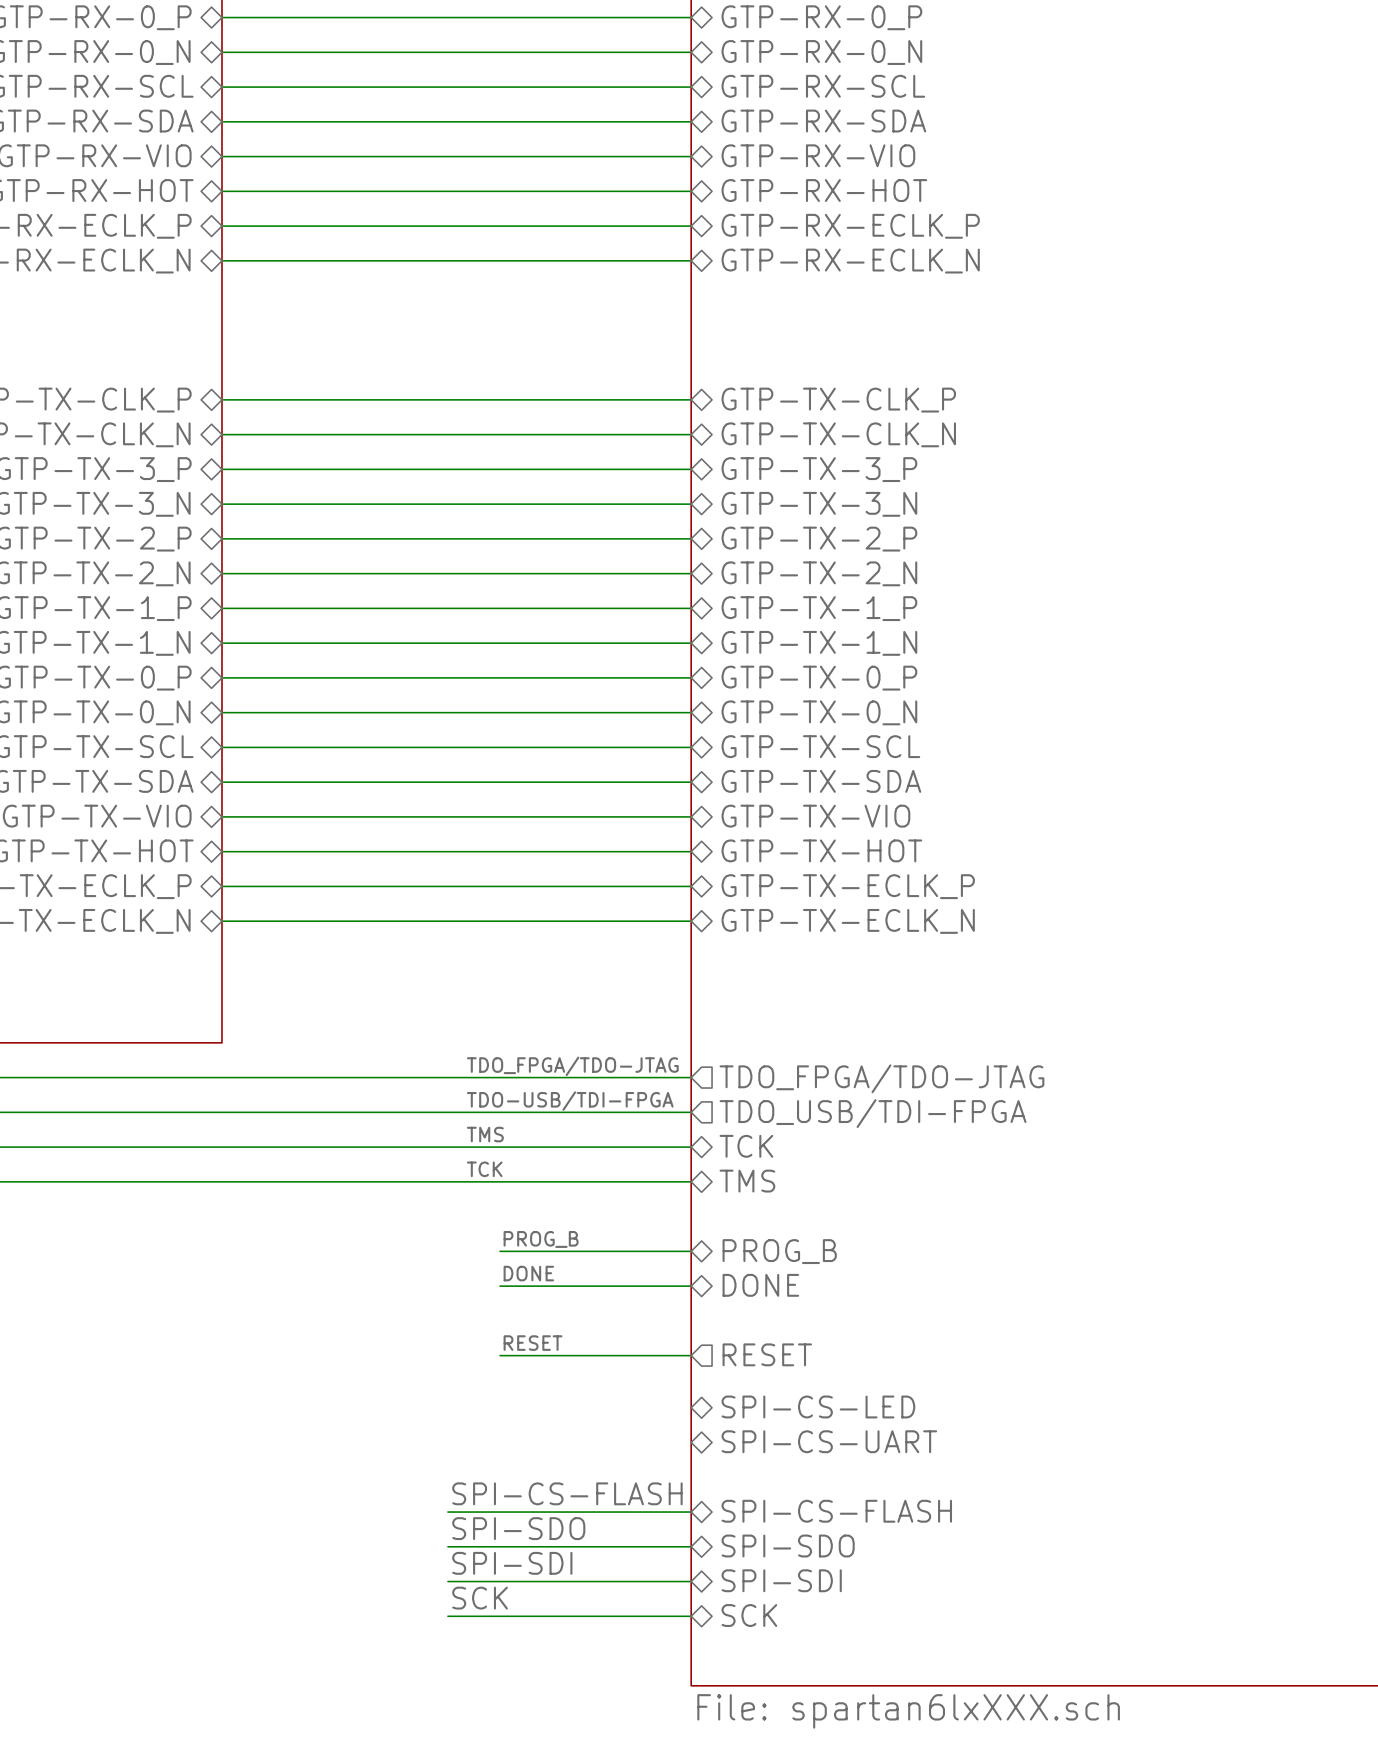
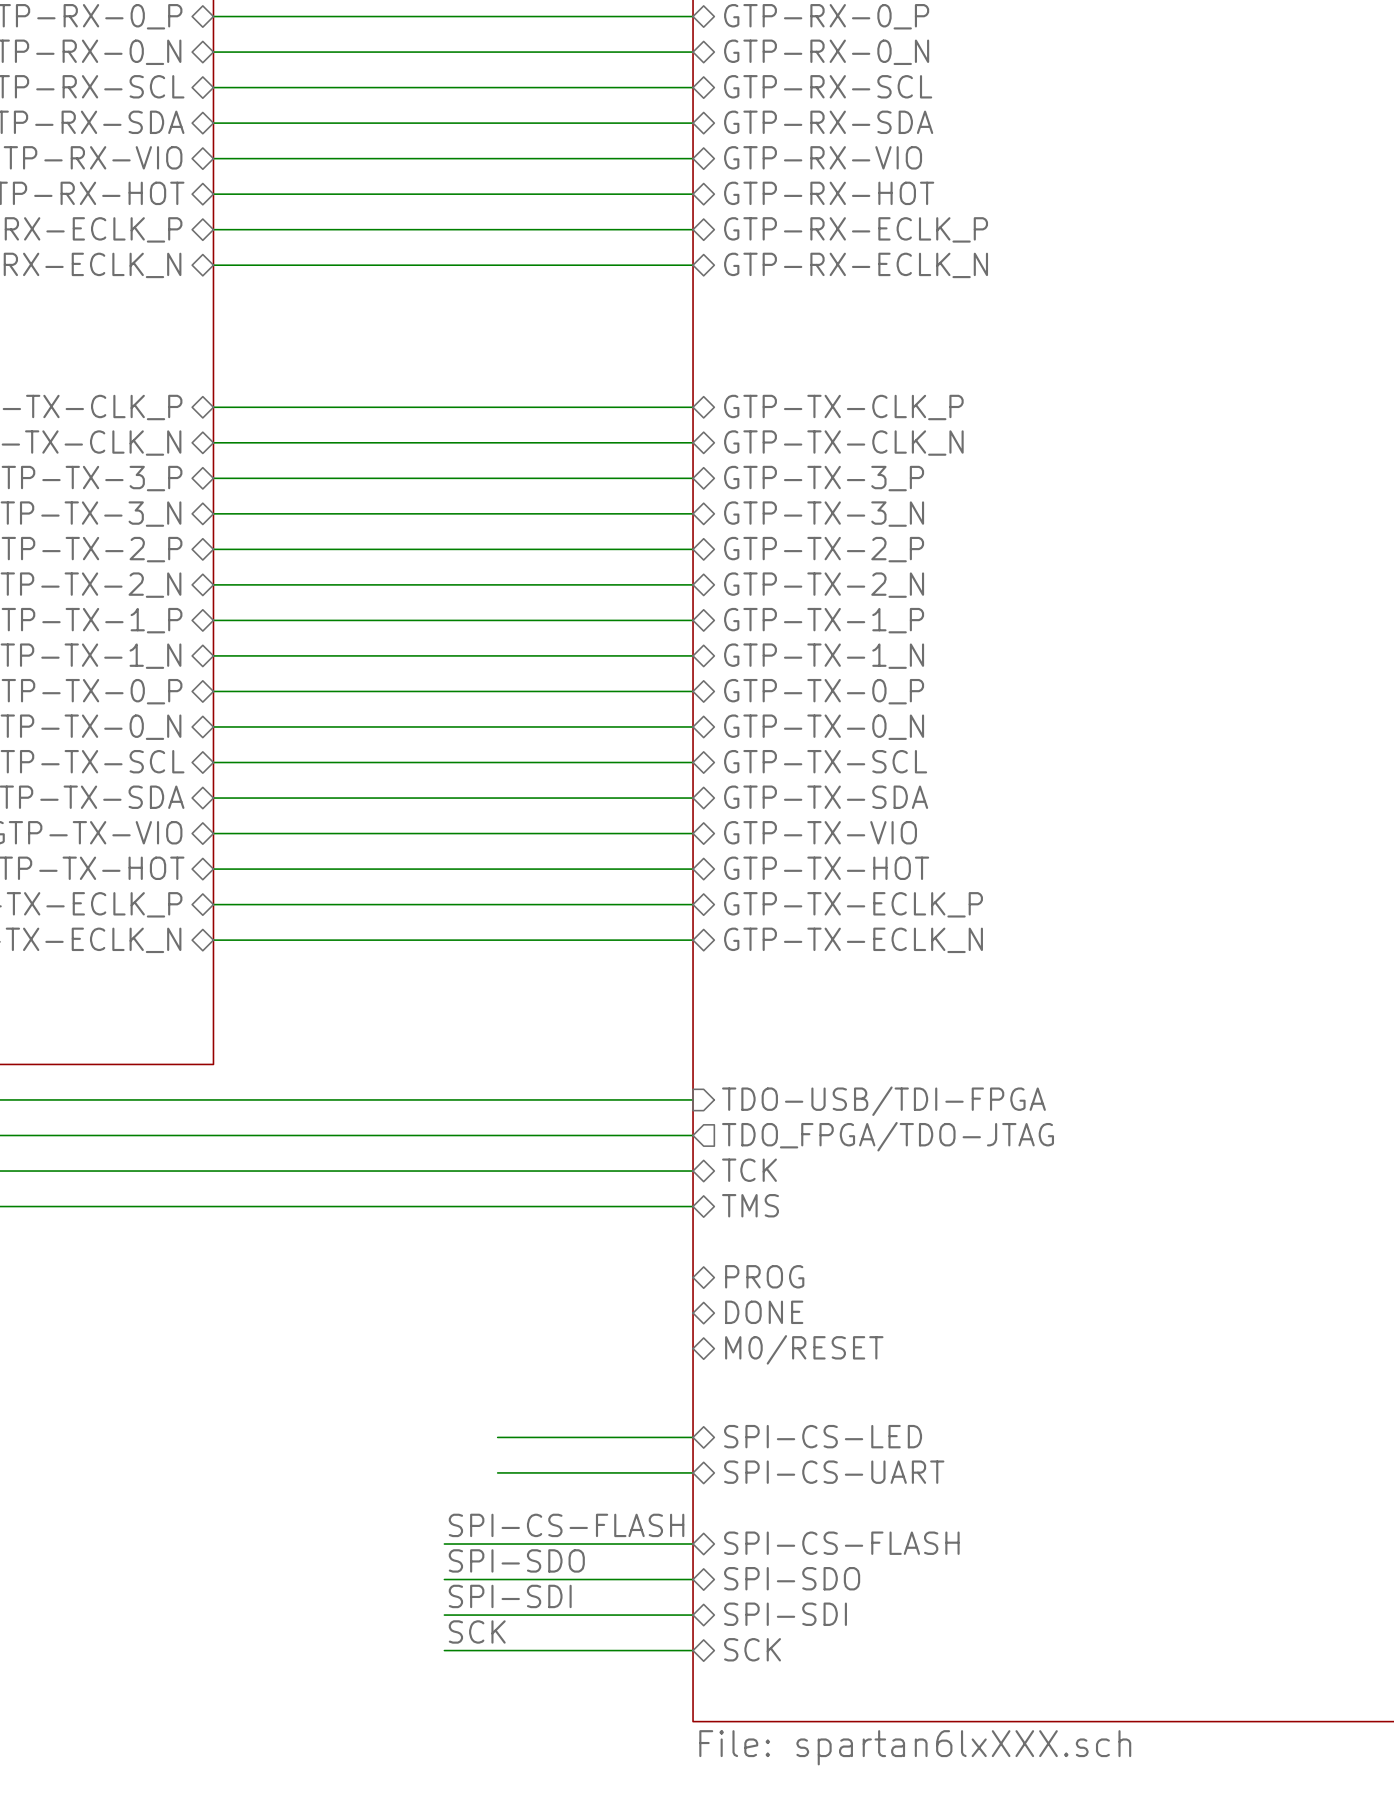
label: TDO_FPGA/TDO-JTAG (572, 1066) -> none
sheet pin shape: output (881, 1078) -> input (883, 1101)
sheet pin: TDO_FPGA/TDO-JTAG (881, 1078) -> TDO-USB/TDI-FPGA (883, 1101)
label: TDO-USB/TDI-FPGA (570, 1101) -> none
sheet pin: TDO_USB/TDI-FPGA (873, 1113) -> TDO_FPGA/TDO-JTAG (888, 1136)
label: TMS (485, 1134) -> none
label: TCK (484, 1169) -> none
label: PROG_B (541, 1239) -> none
wire: (500, 1251) (691, 1251) -> (497, 1437) (693, 1437)
sheet pin: PROG_B (779, 1251) -> PROG (764, 1276)
label: DONE (528, 1273) -> none
wire: (500, 1286) (691, 1286) -> (497, 1472) (693, 1472)
label: RESET (533, 1343) -> none
sheet pin shape: output (767, 1354) -> bidirectional (804, 1349)
sheet pin: RESET (767, 1354) -> M0/RESET (804, 1349)
wire: (500, 1355) (691, 1355) -> none

